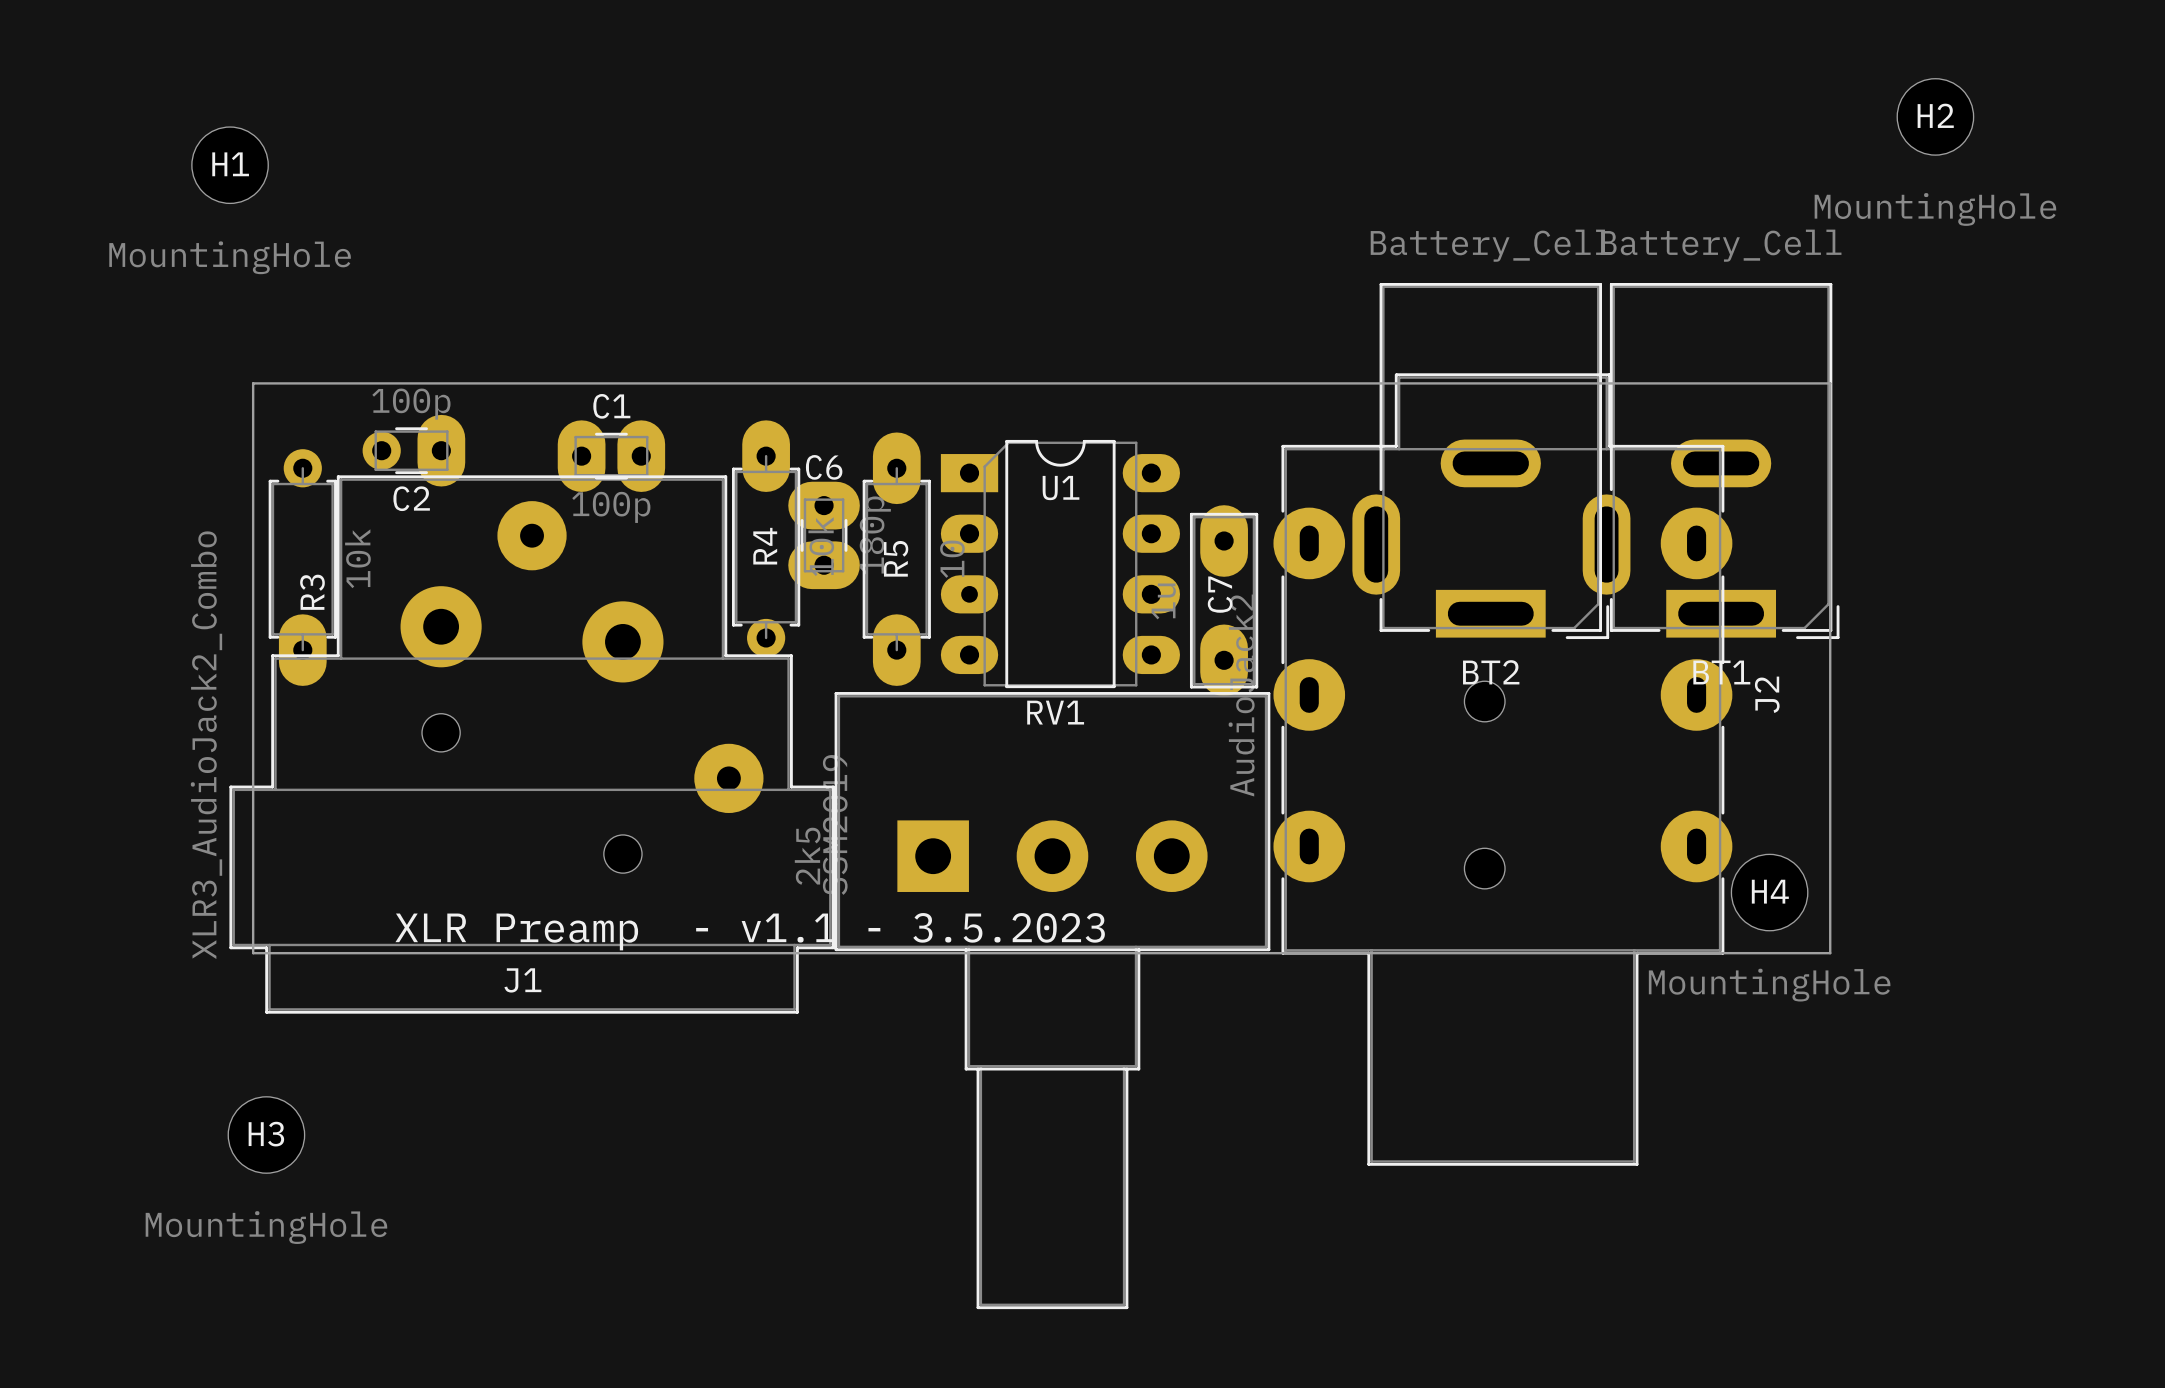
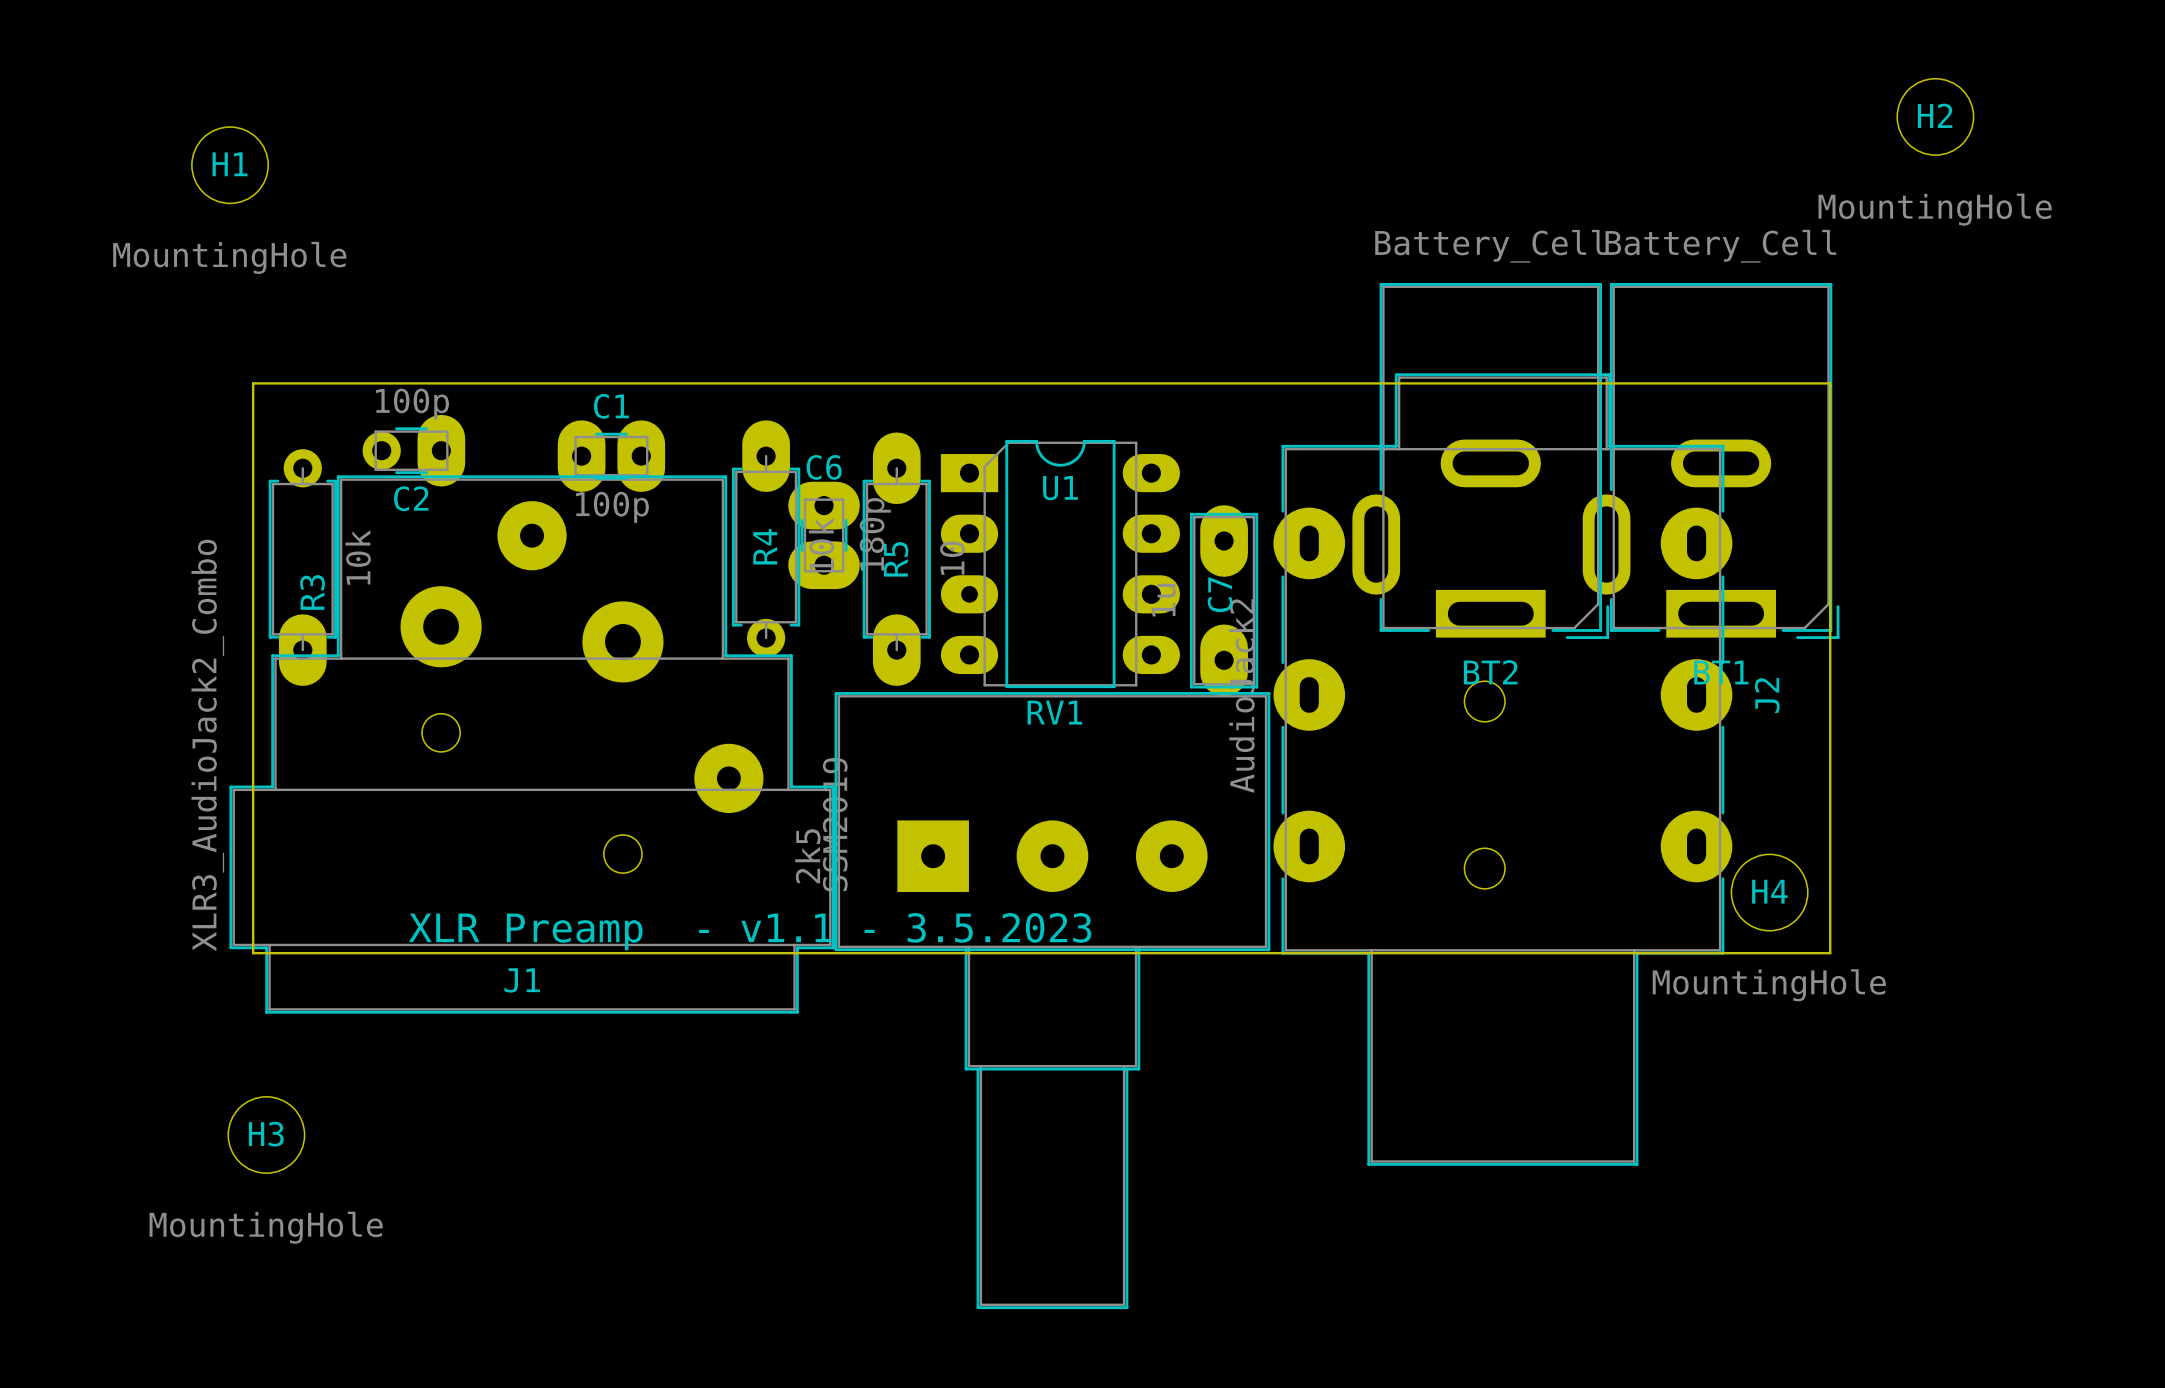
RV1 footprint: [834, 692, 1271, 1310] -> [834, 692, 1271, 1310]

